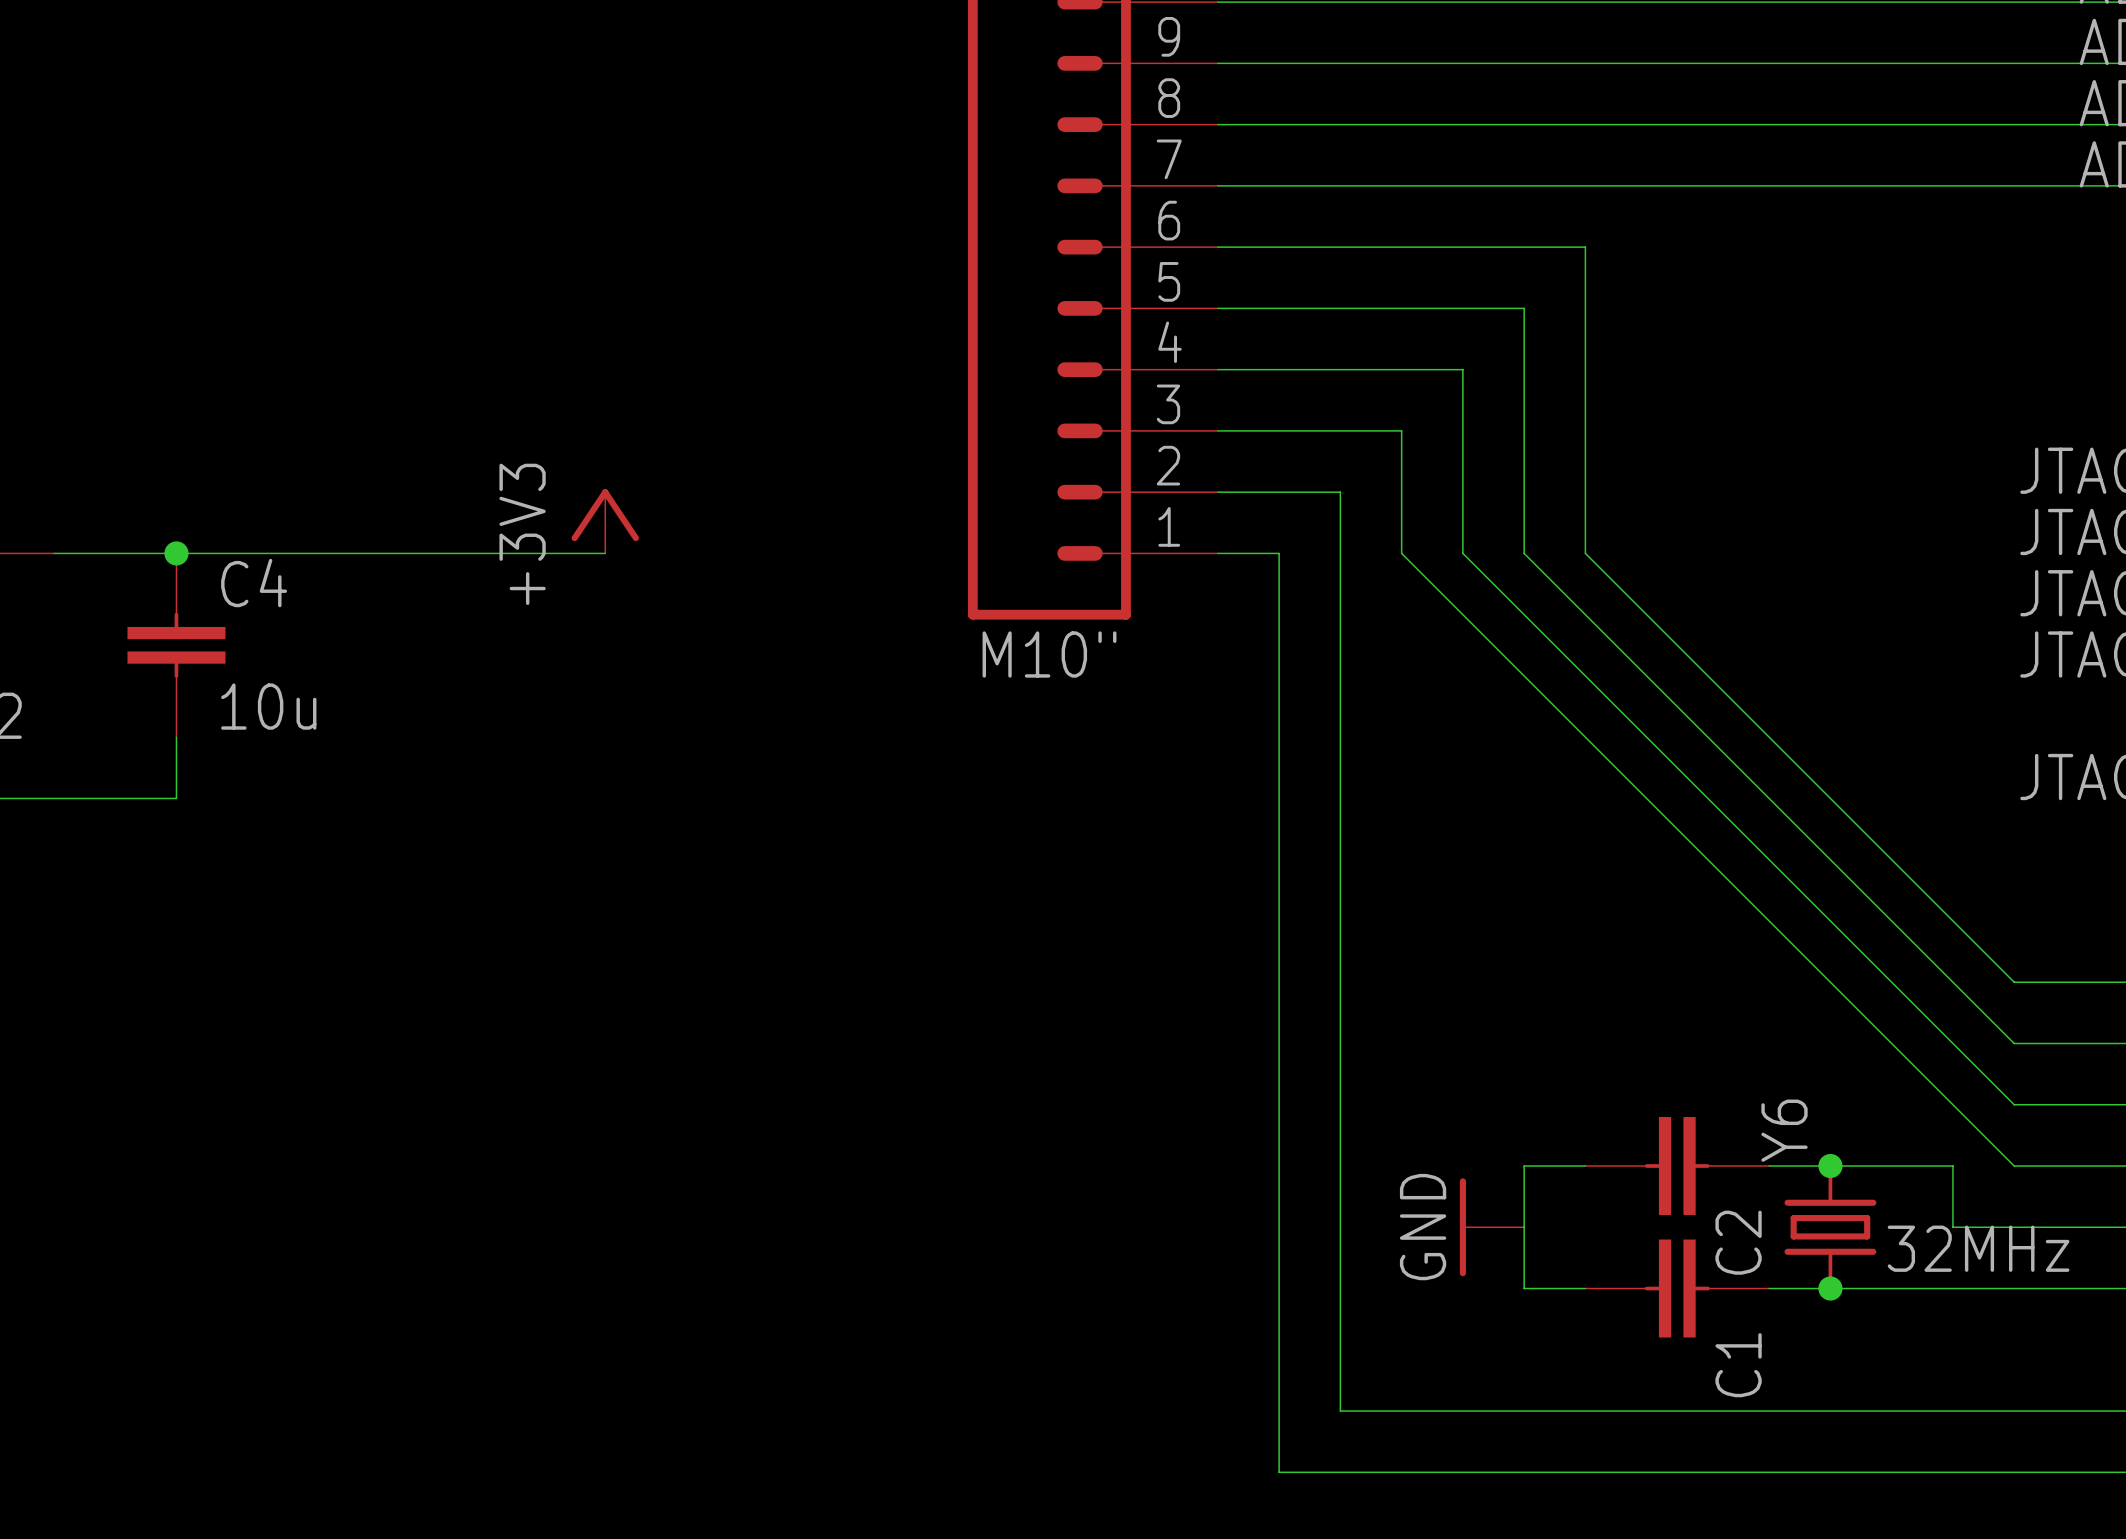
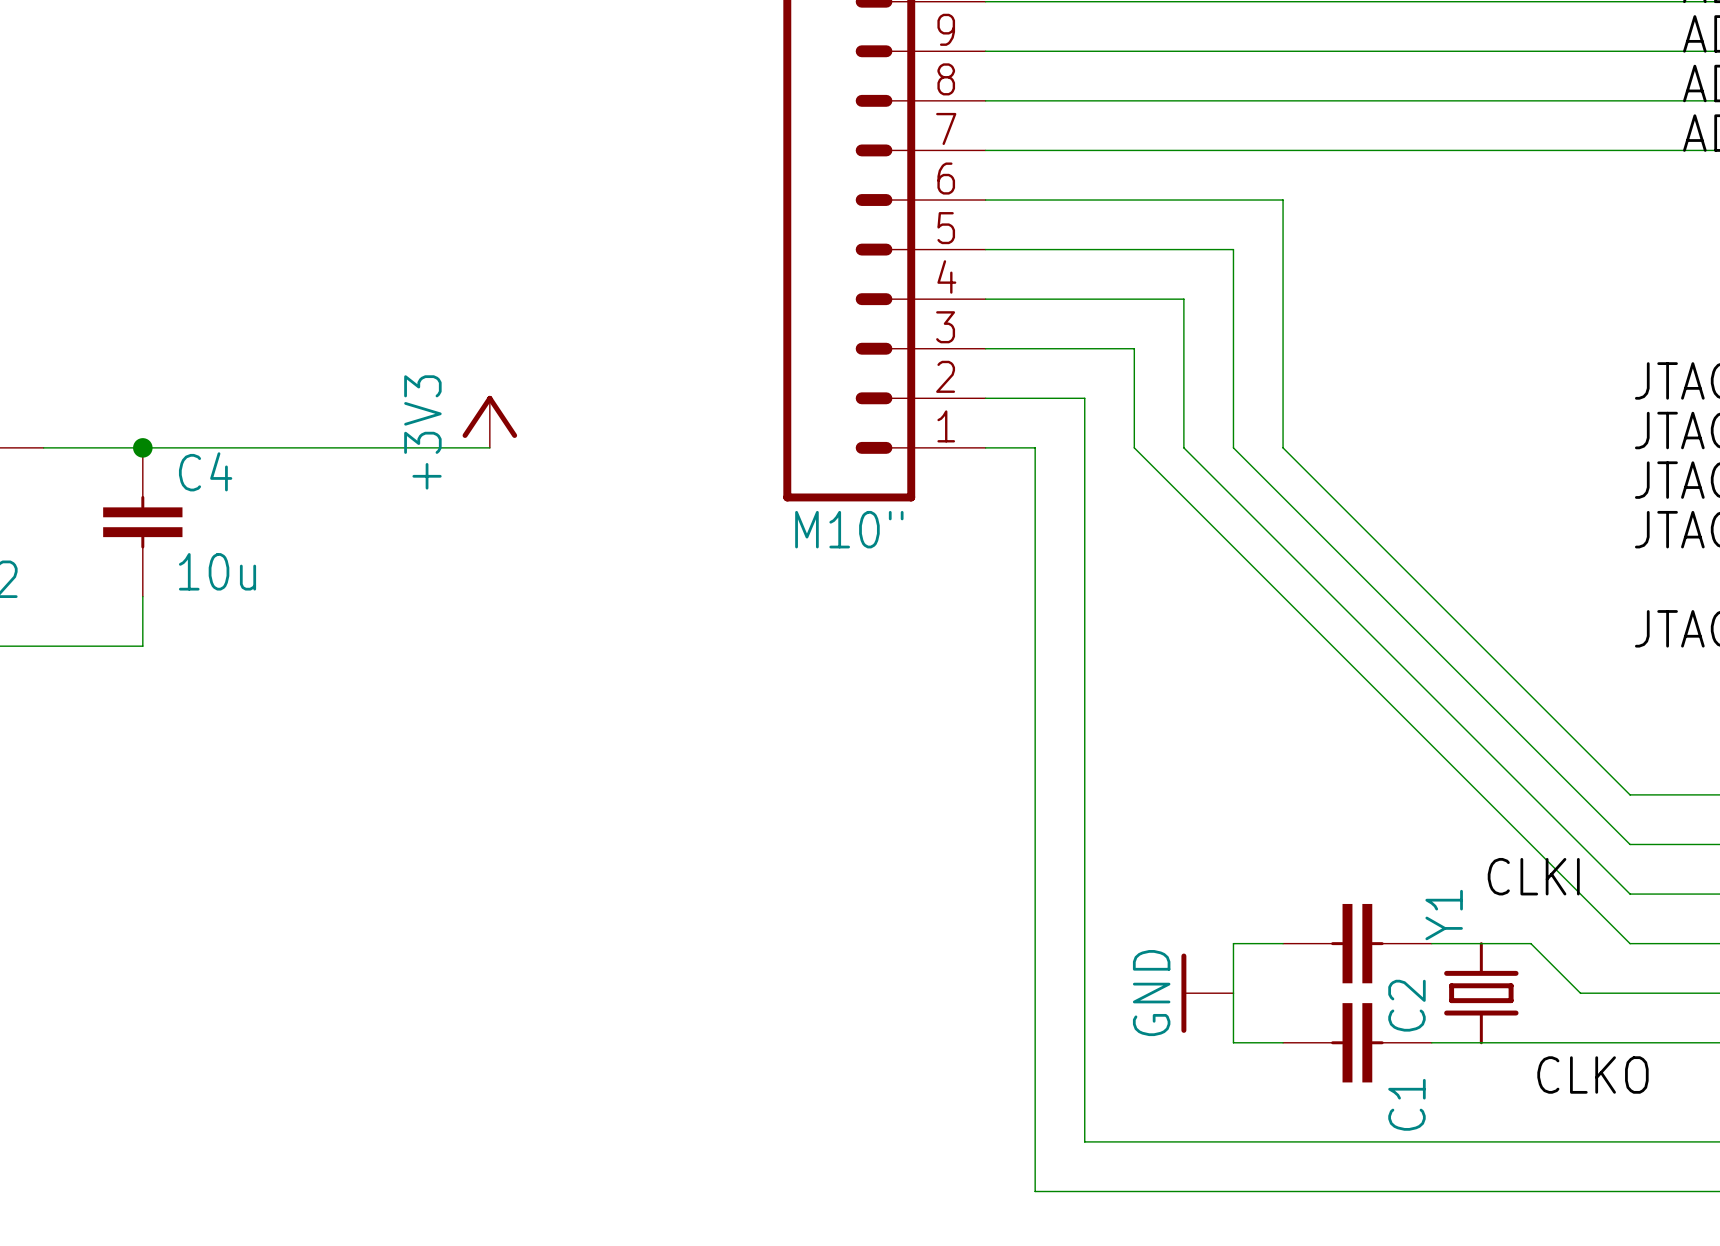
label: none -> CLKI (1533, 876)
Y6 name: Y6 (1784, 1130) -> Y1 (1444, 915)
junction: (1830, 1166) -> none
wire: (1891, 1166) (1952, 1166) (1952, 1227) -> (1530, 943) (1580, 993)
Y6 value: 32MHz (1978, 1248) -> none
junction: (1830, 1288) -> none
label: none -> CLKO (1592, 1075)

